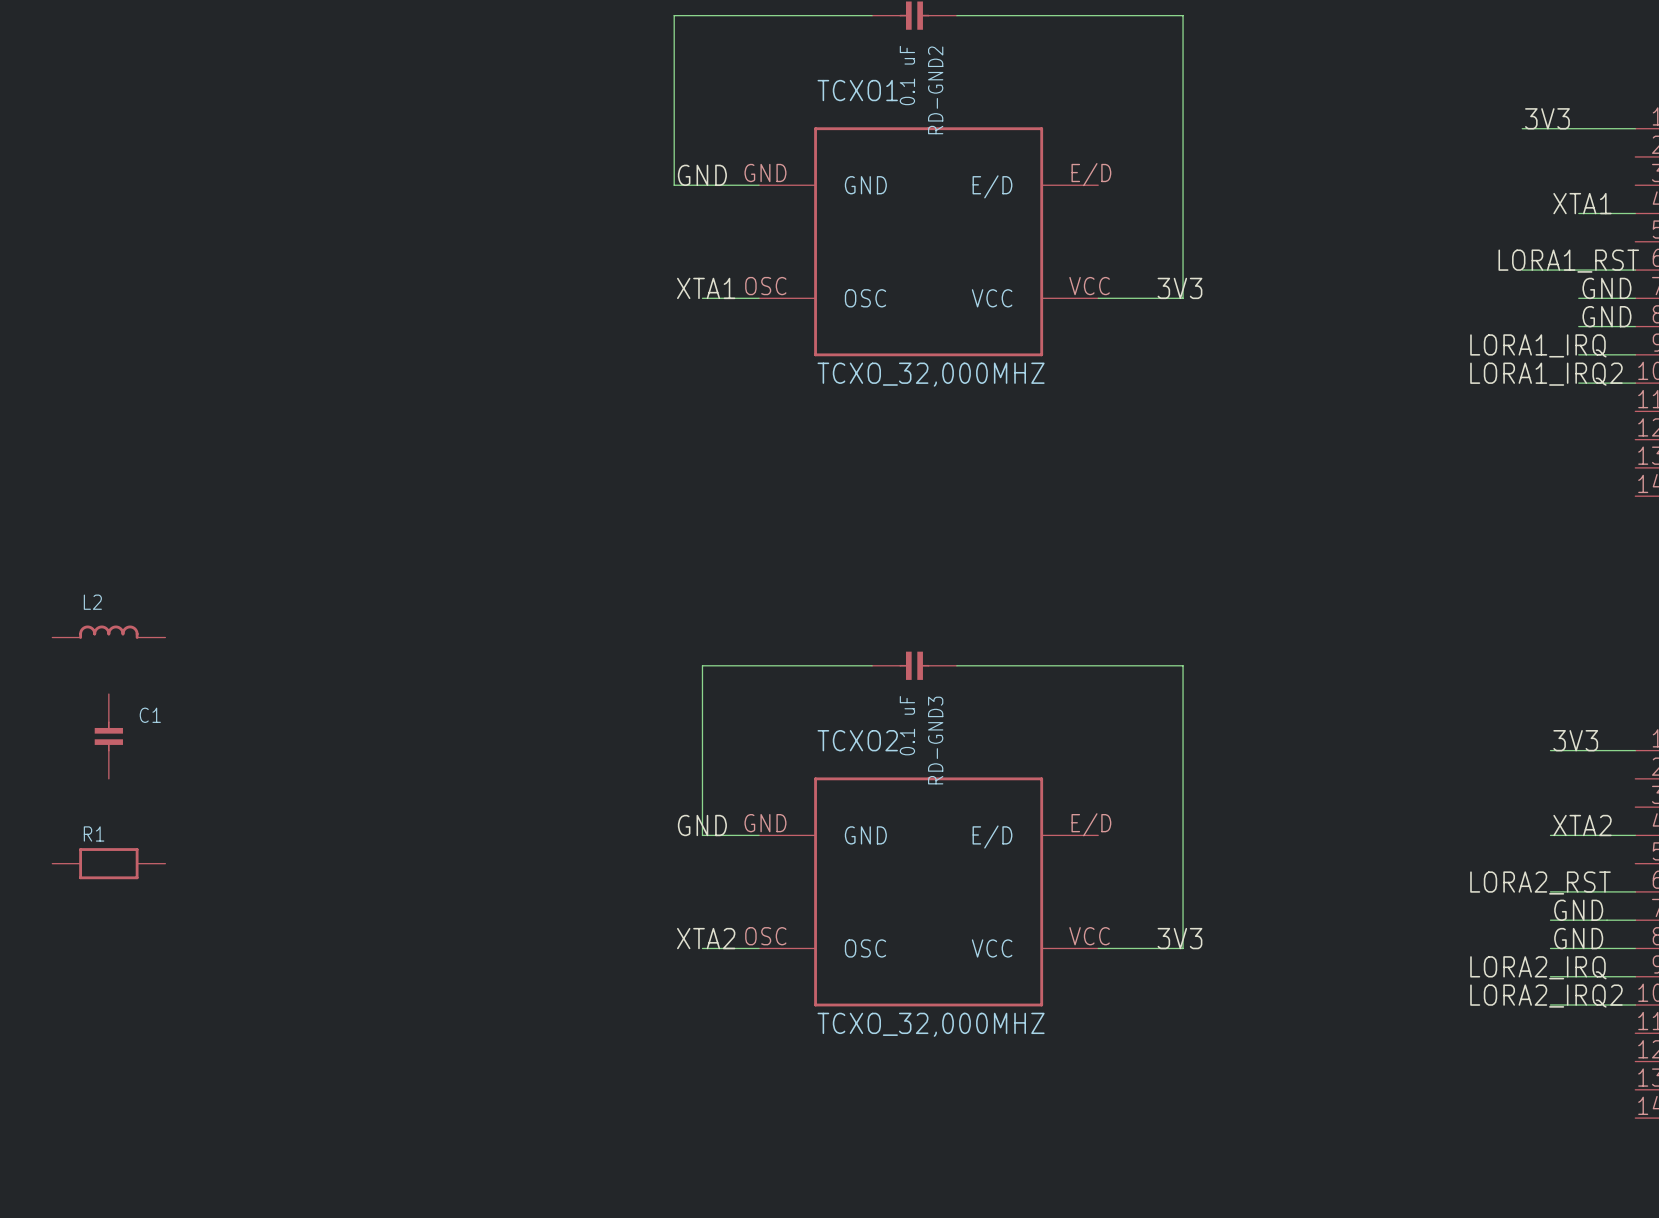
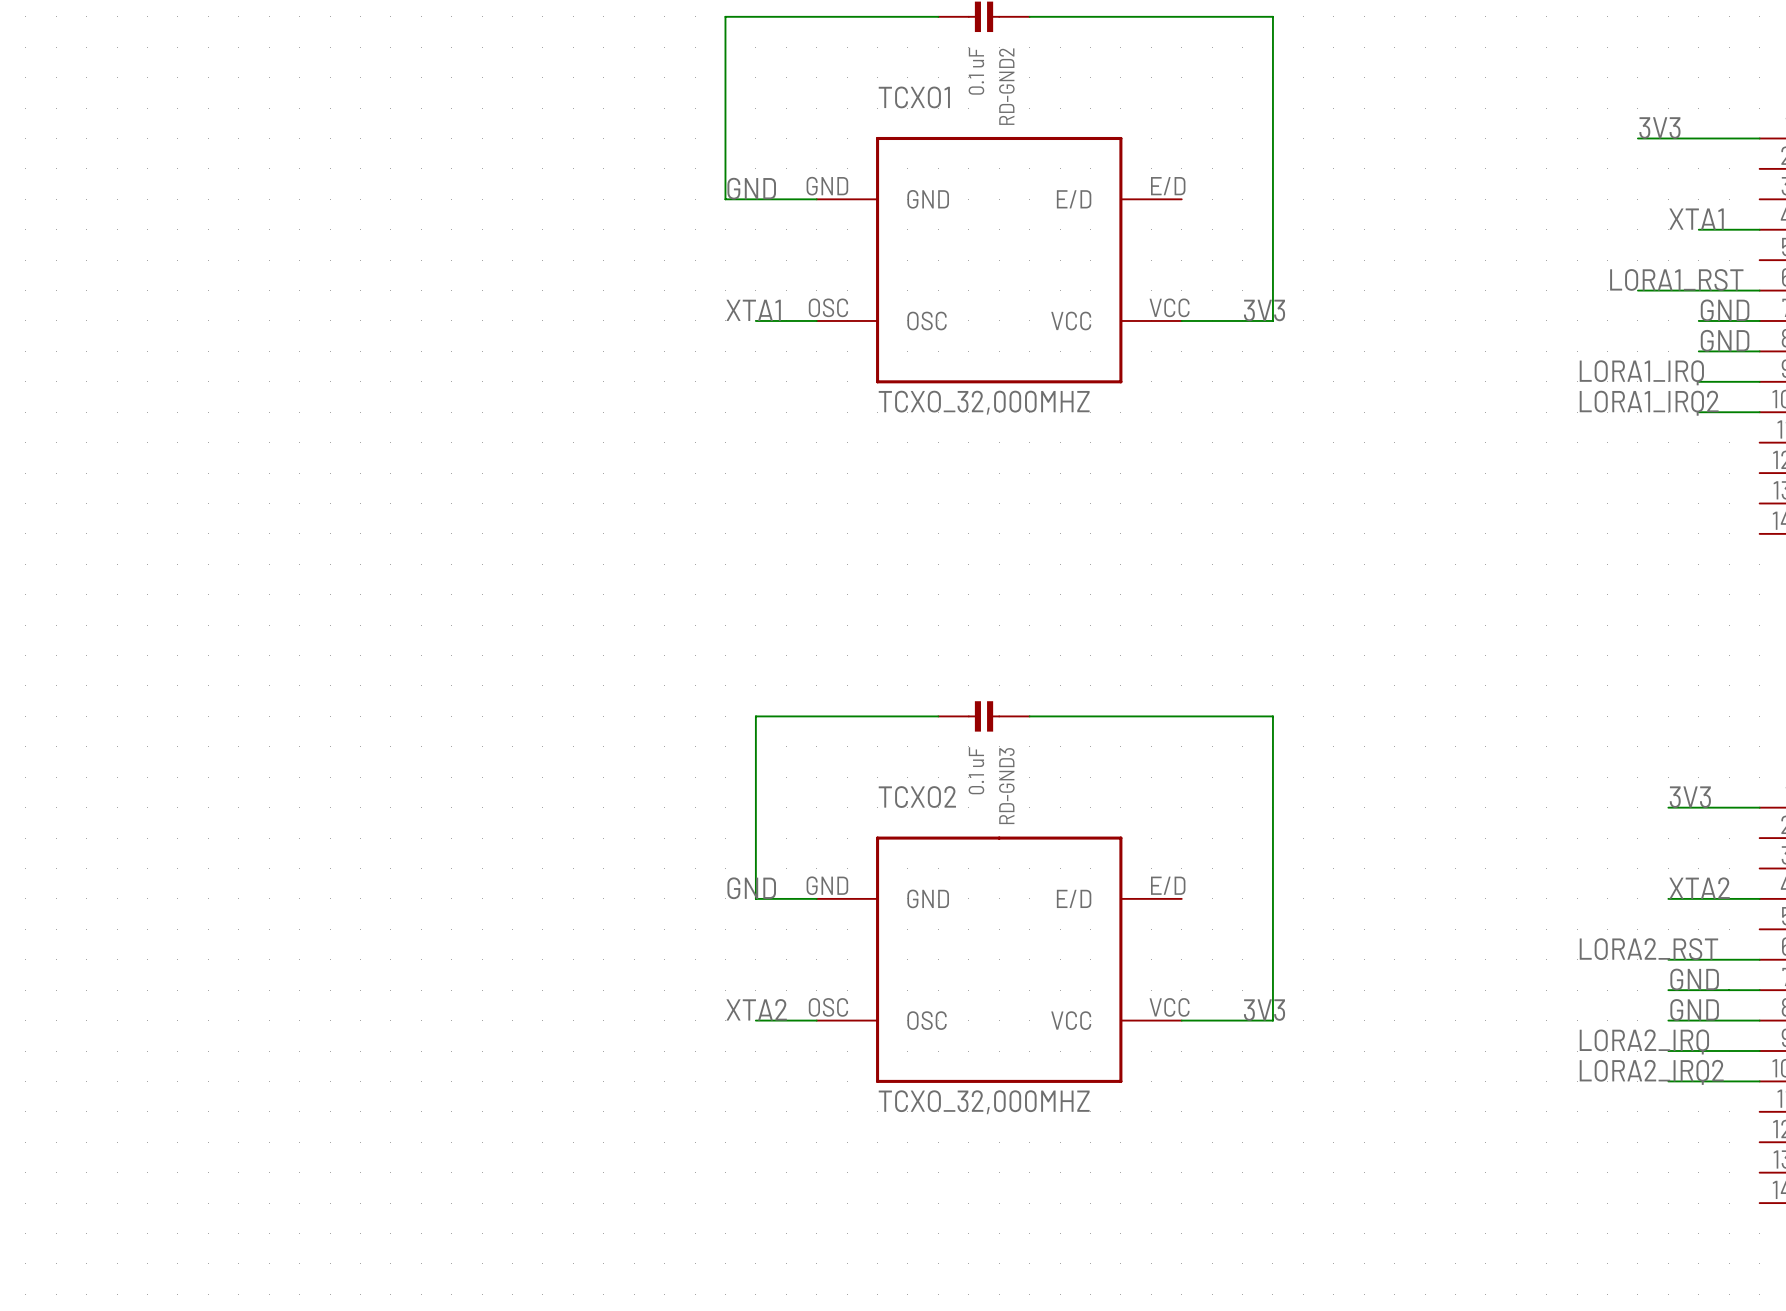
L2: (108, 632) -> none
C1: (108, 736) -> none
R1: (108, 863) -> none

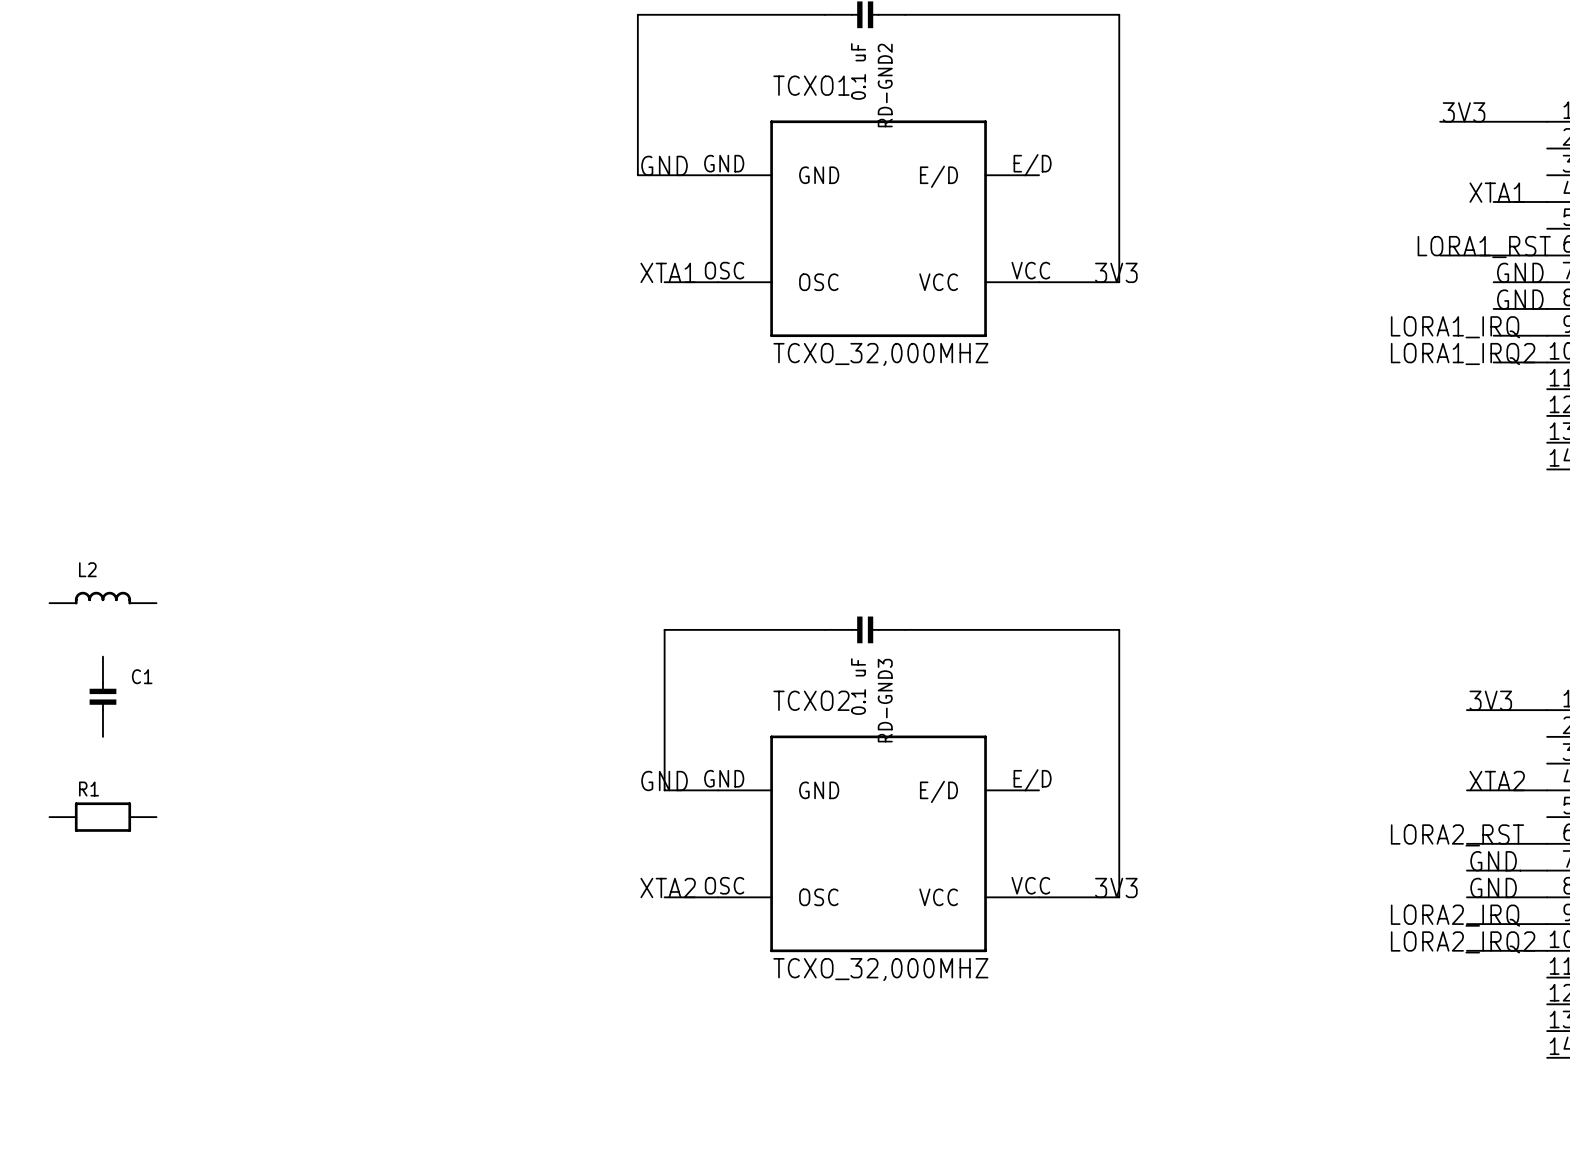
L2: none -> (102, 598)
C1: none -> (102, 696)
R1: none -> (102, 817)

